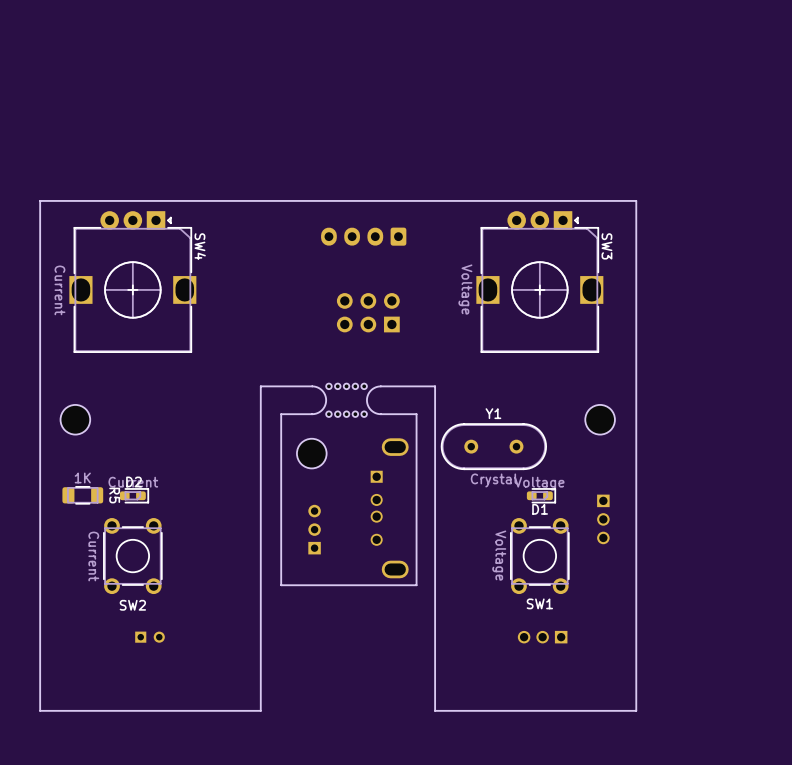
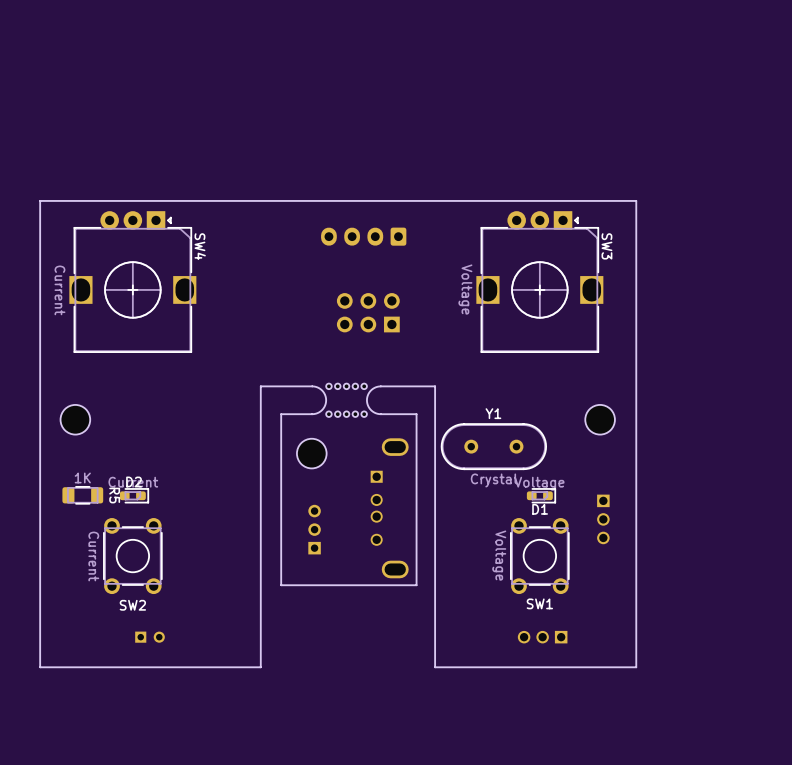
board edge: (260, 667) (260, 710) (40, 710) (40, 667) -> (260, 667) (40, 667)
board edge: (636, 667) (636, 710) (435, 710) (435, 667) -> (636, 667) (435, 667)

